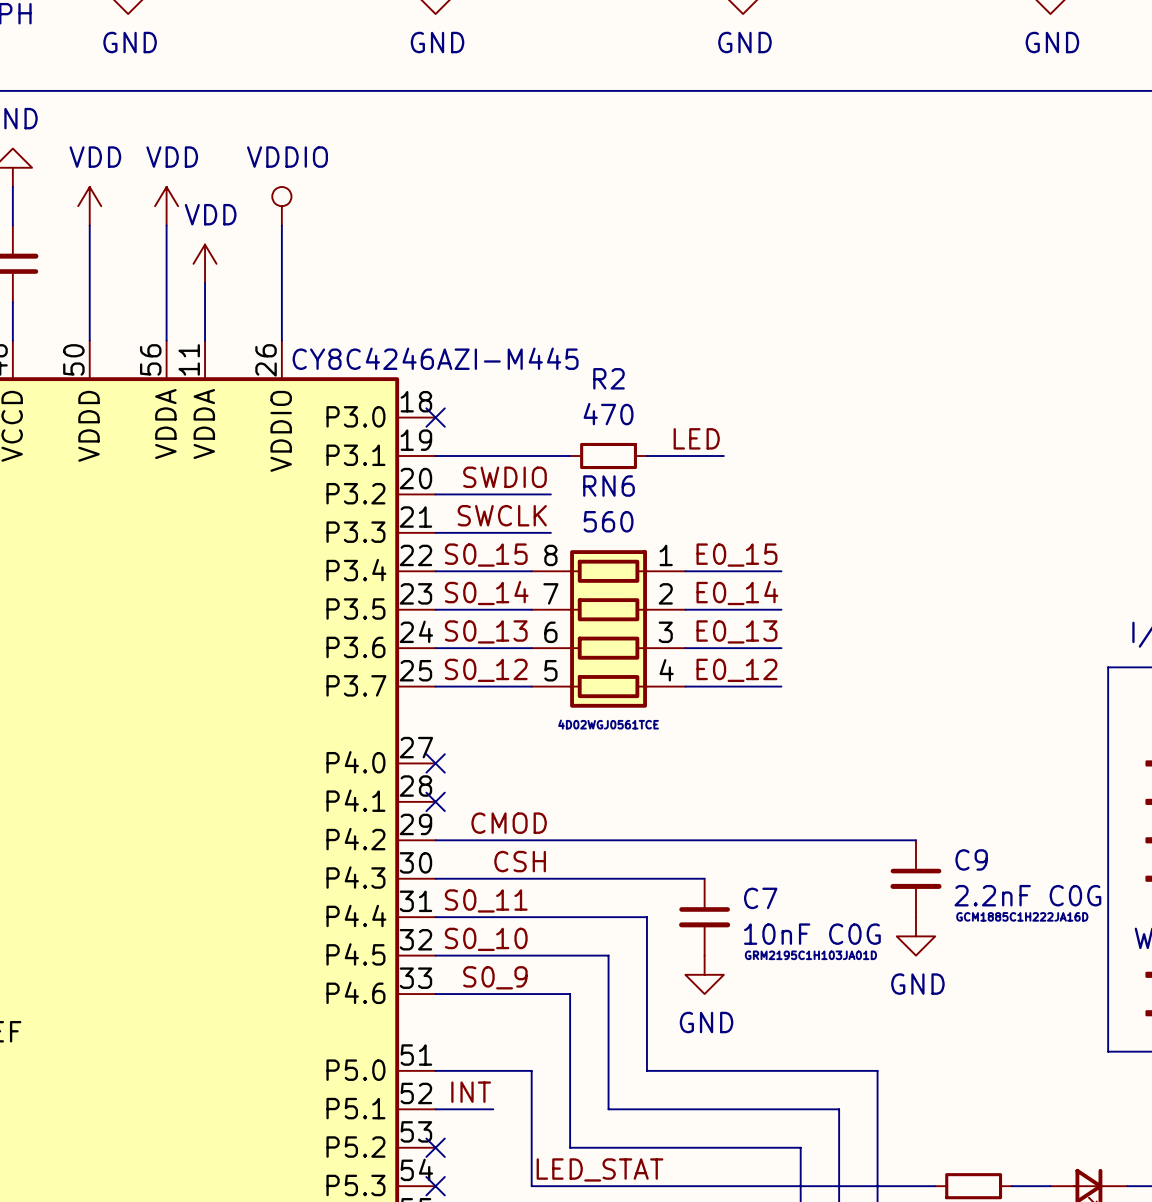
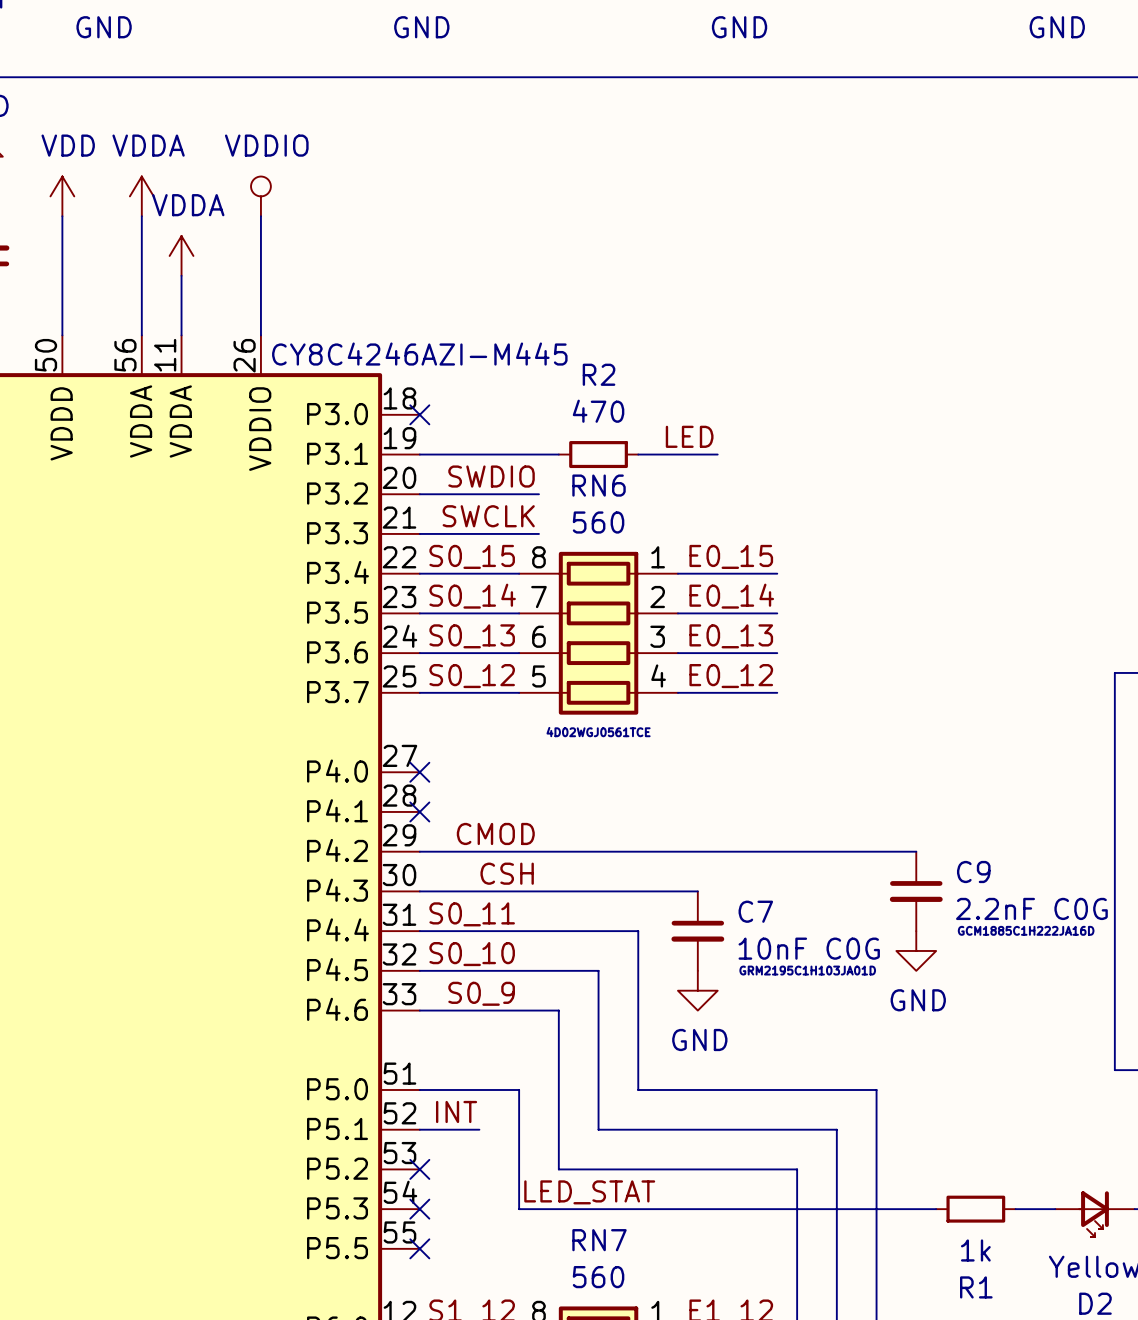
power symbol: VDD (166, 206) -> VDDA (141, 196)
power symbol: VDD (205, 263) -> VDDA (181, 255)

